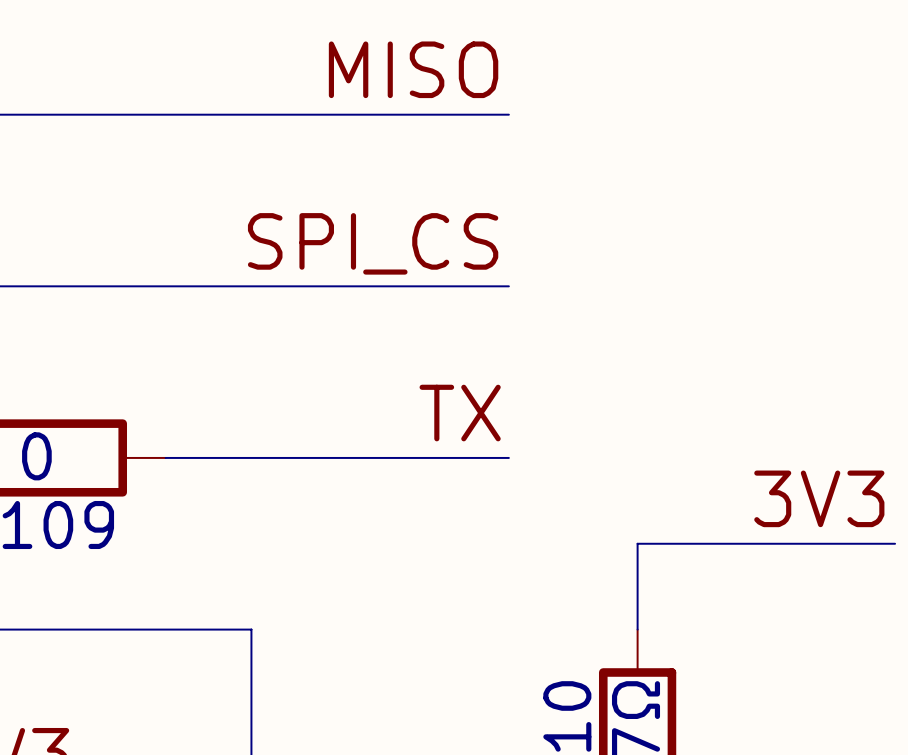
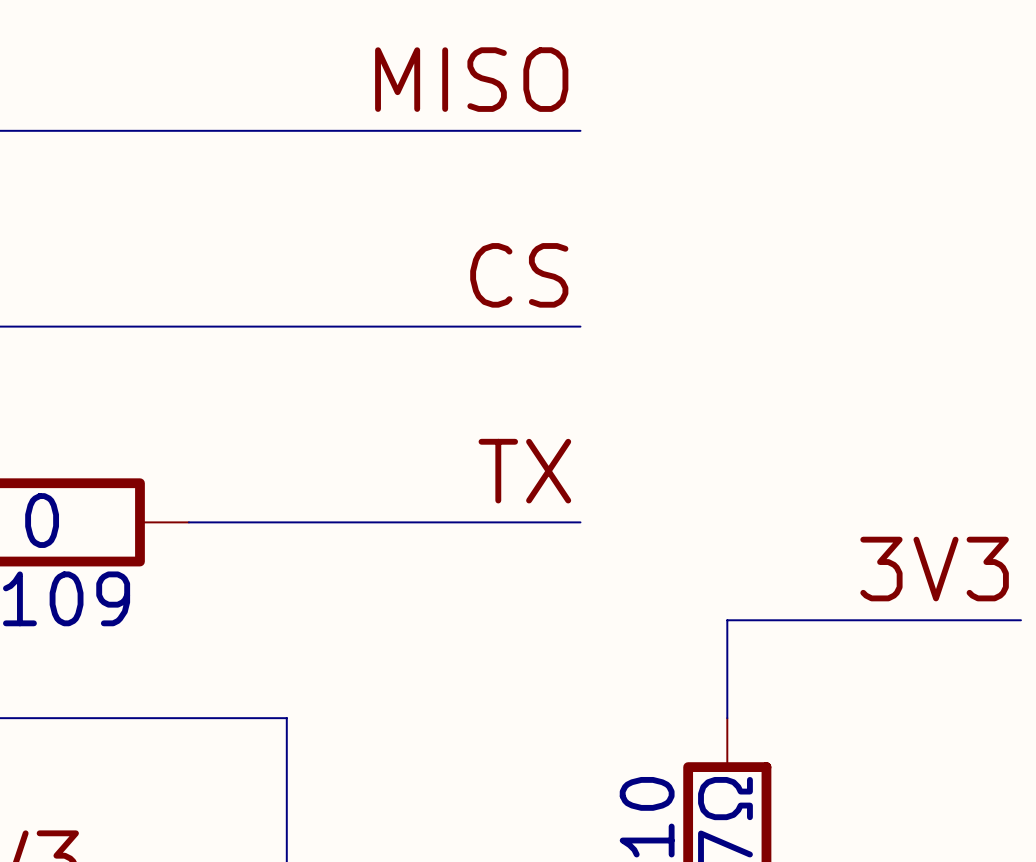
label: SPI_CS (373, 243) -> CS (519, 275)

